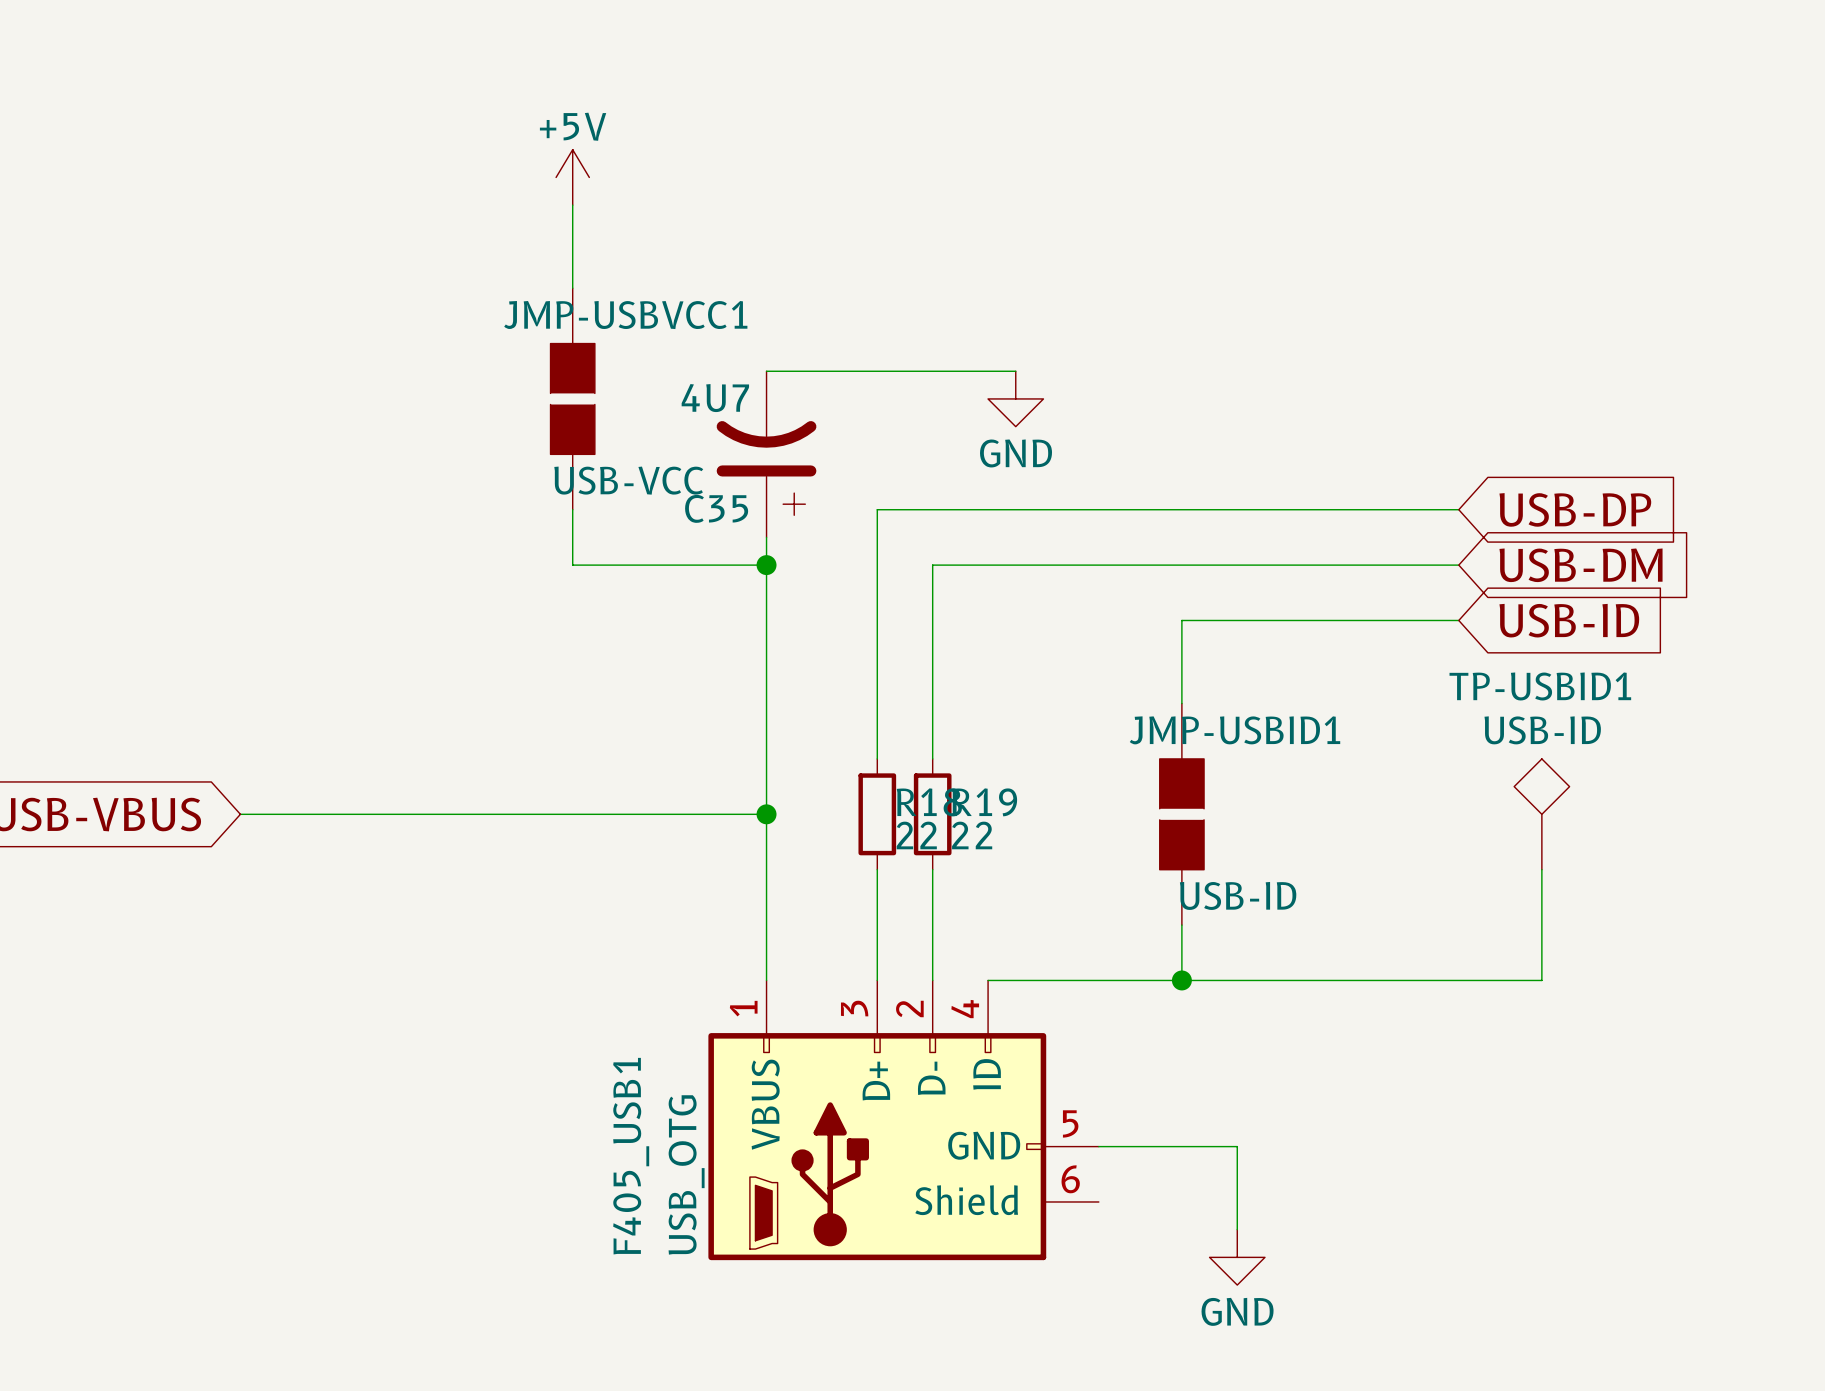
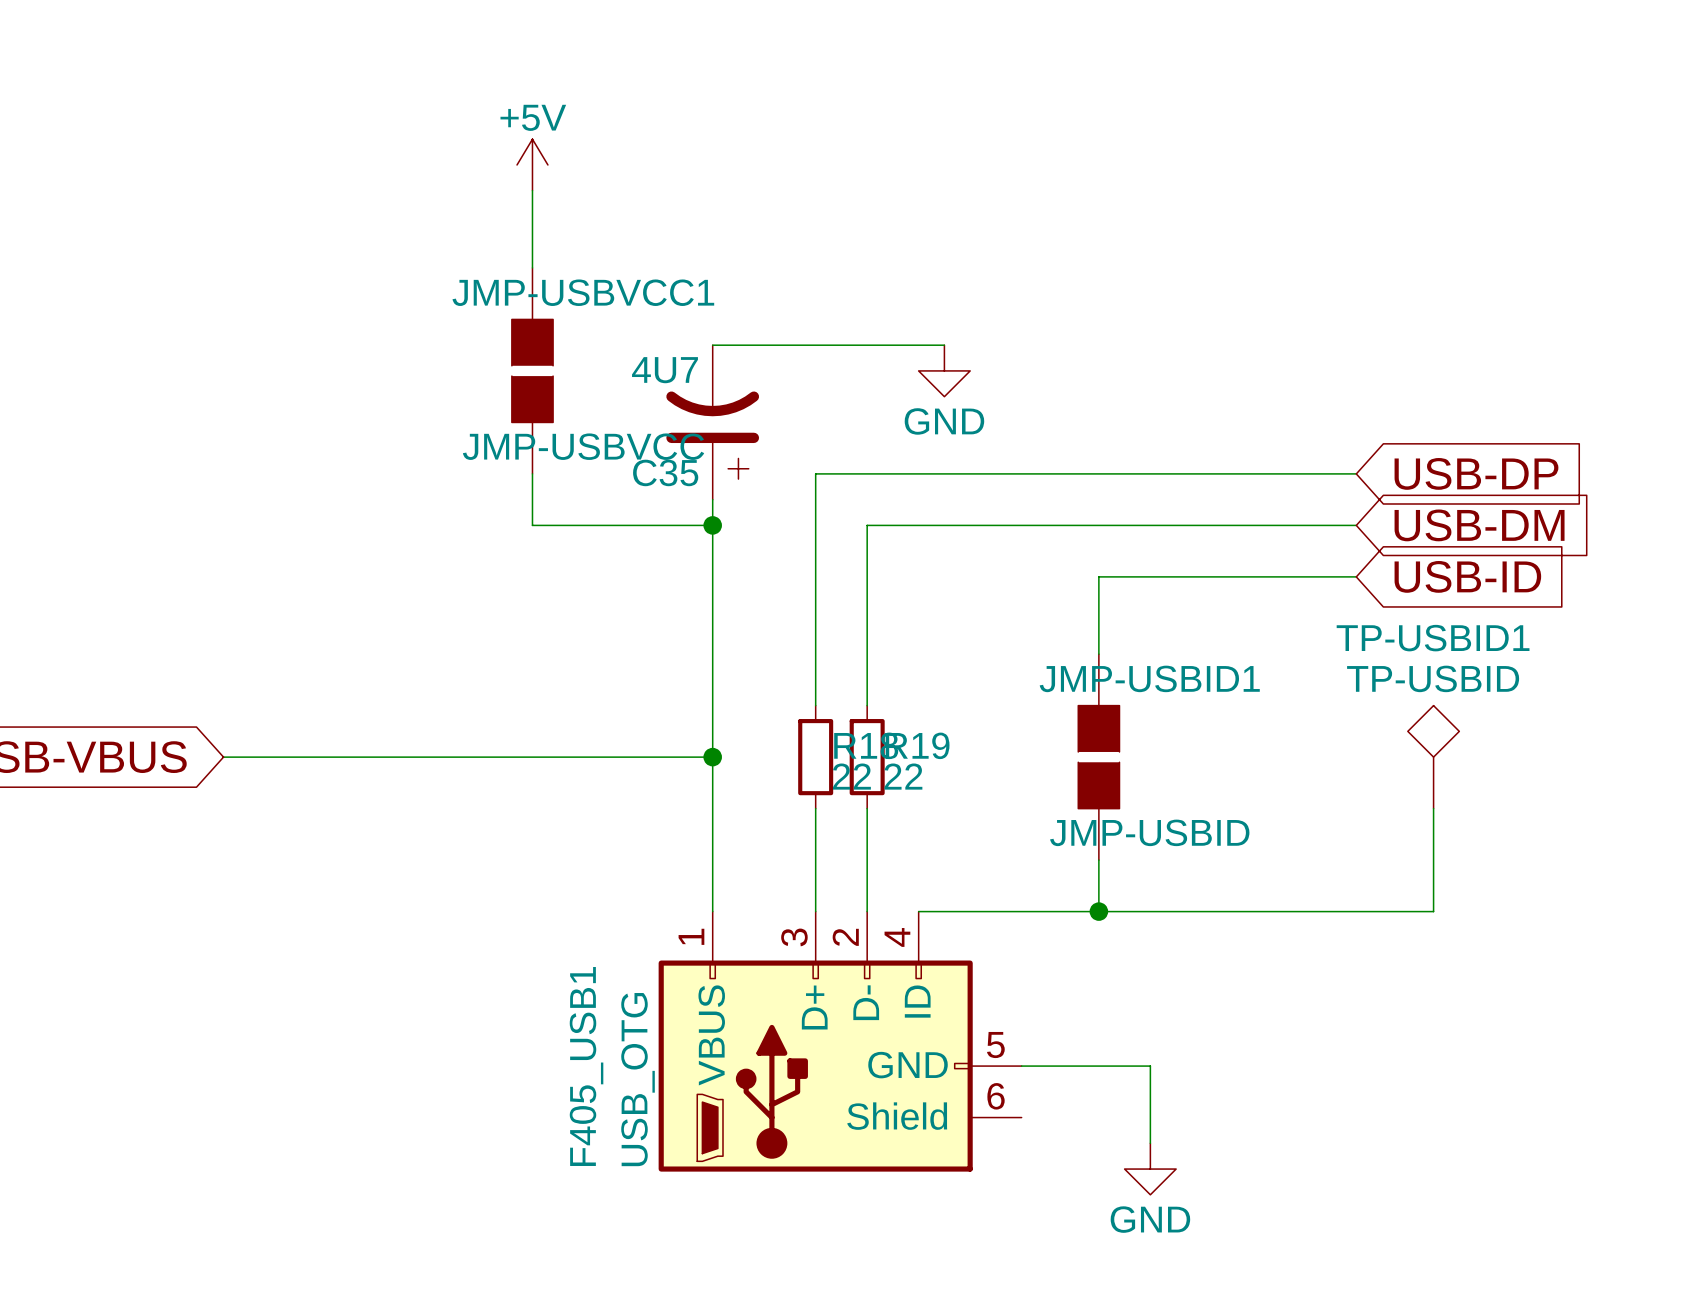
JMP-USBVCC1 value: USB-VCC (628, 480) -> JMP-USBVCC (583, 446)
TP-USBID1 value: USB-ID (1542, 730) -> TP-USBID (1433, 678)
JMP-USBID1 value: USB-ID (1238, 895) -> JMP-USBID (1149, 832)

